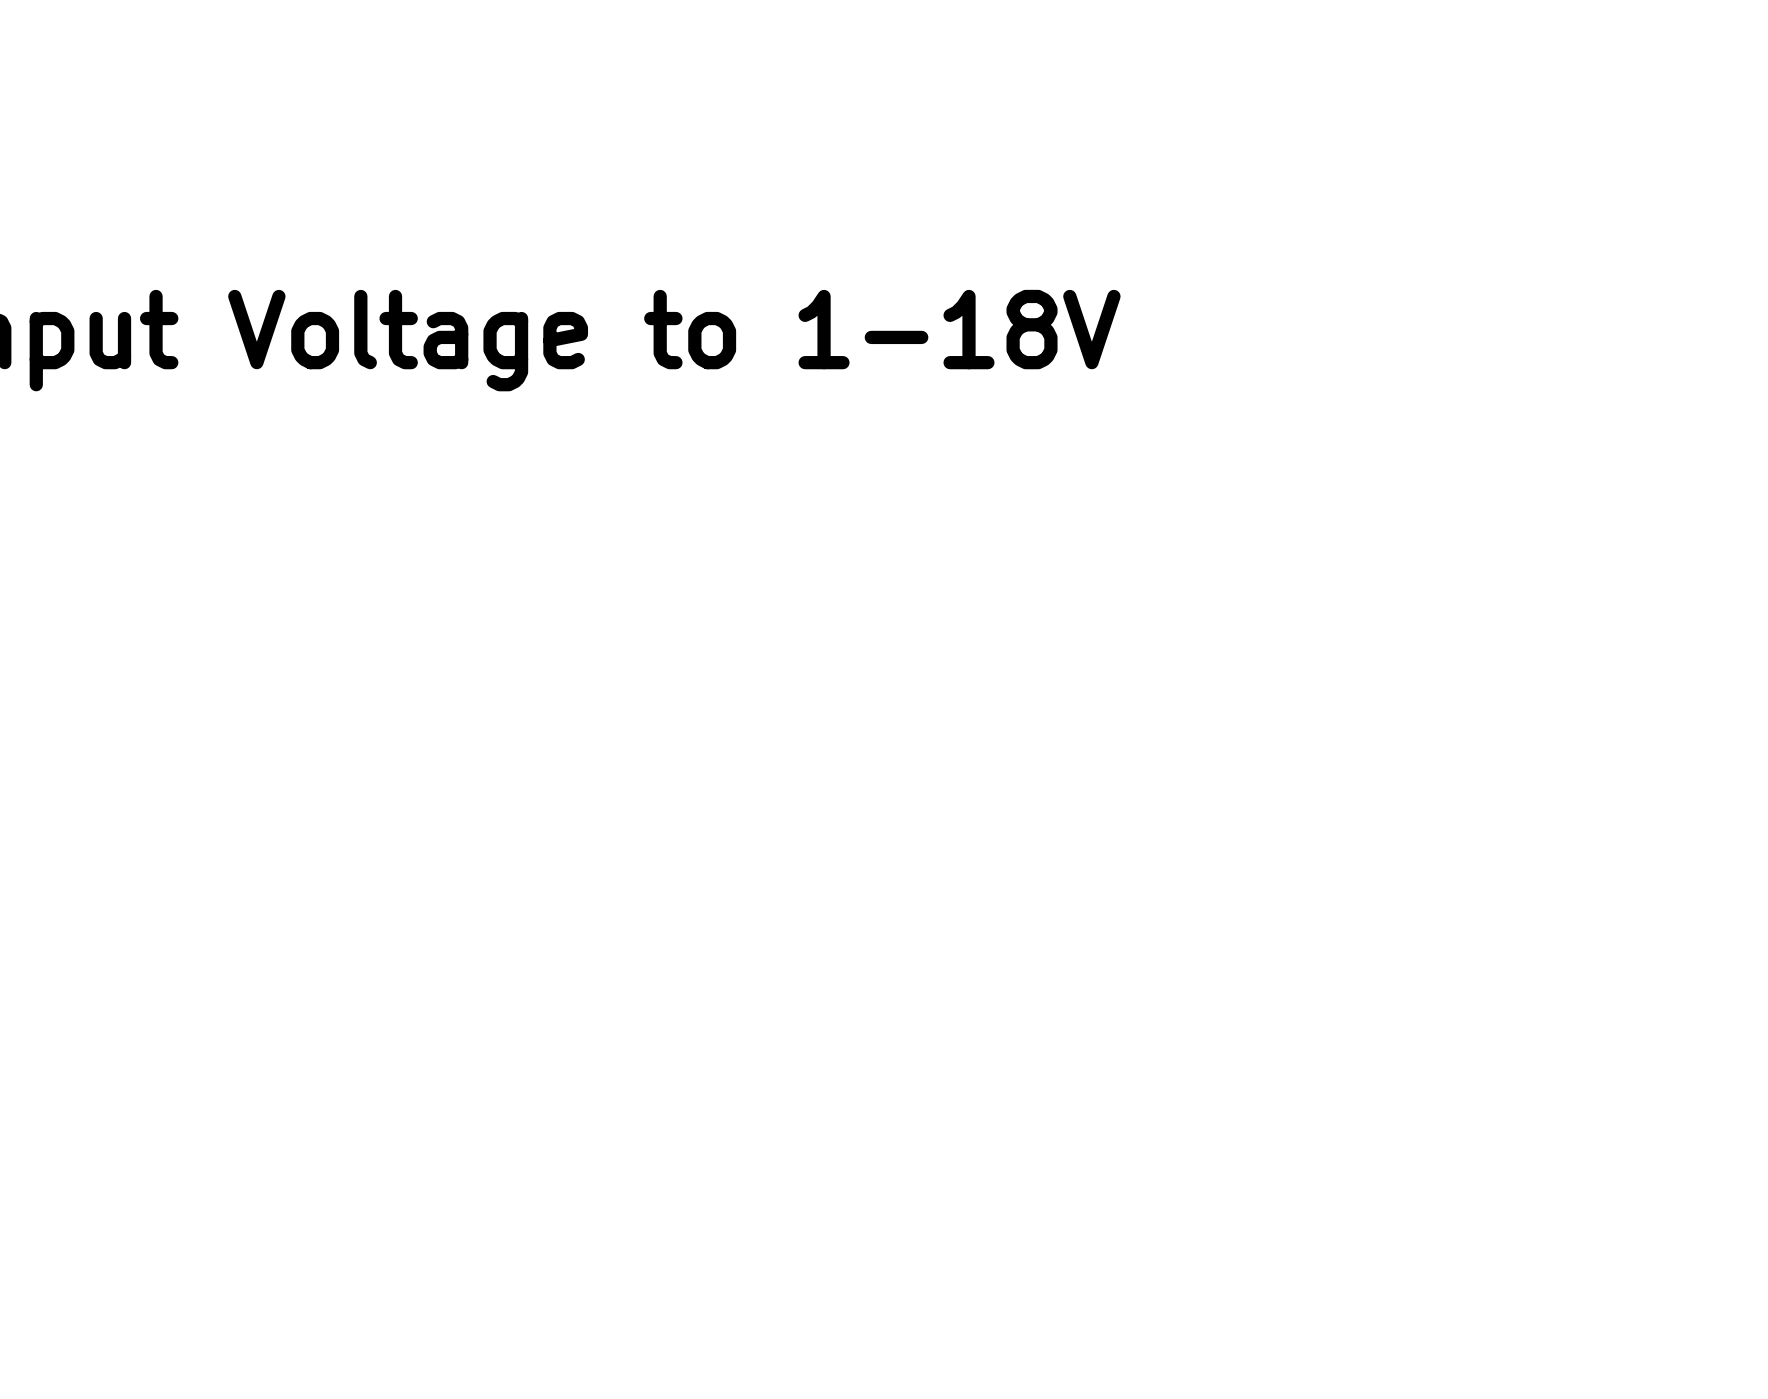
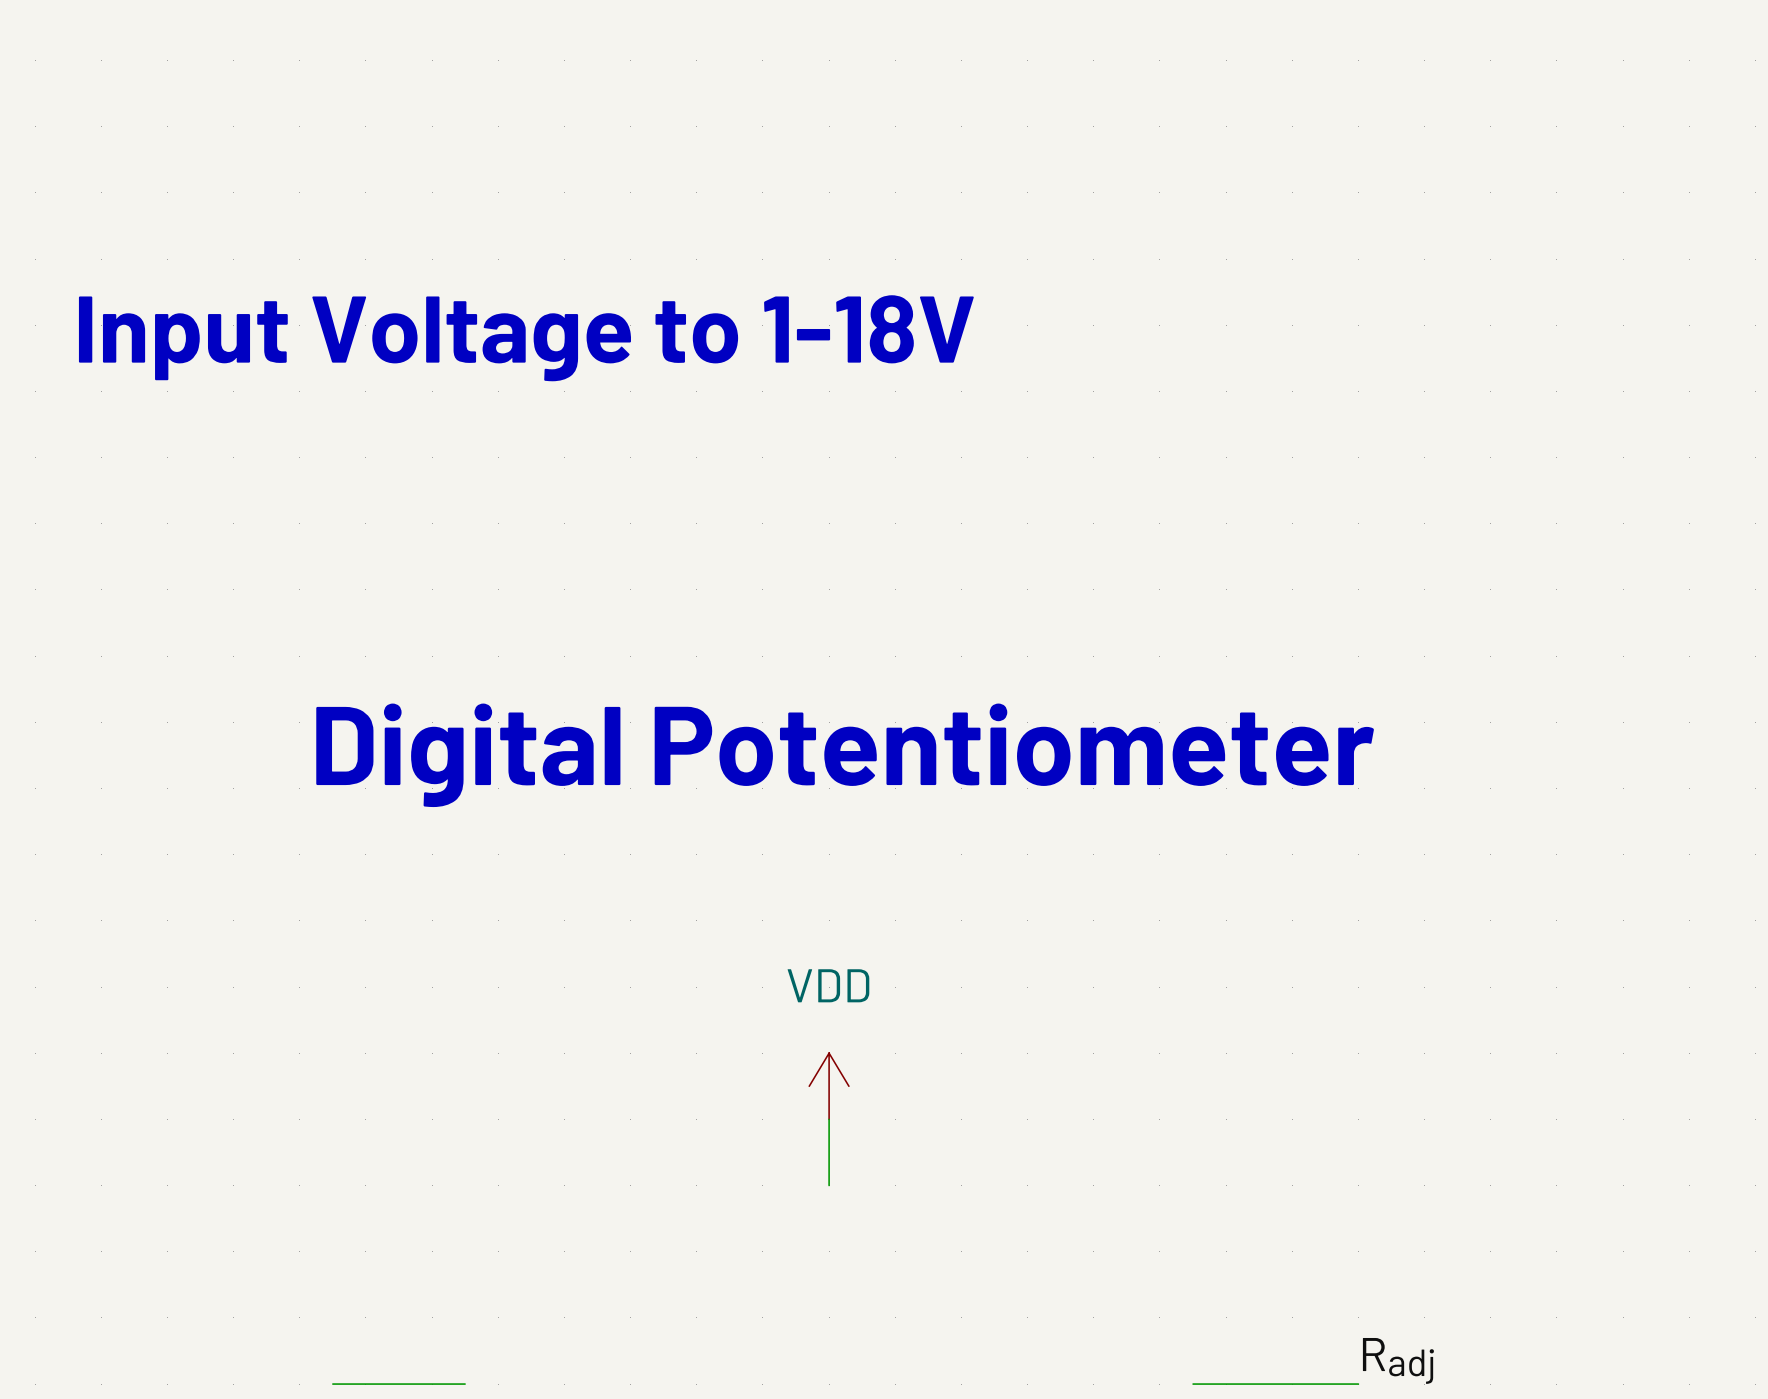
text: none -> Digital Potentiometer (845, 755)
power symbol: none -> VDD (829, 1086)
wire: none -> (829, 1119) (829, 1185)
label: none -> Radj (1398, 1360)
wire: none -> (332, 1384) (465, 1384)
wire: none -> (1193, 1384) (1358, 1384)

